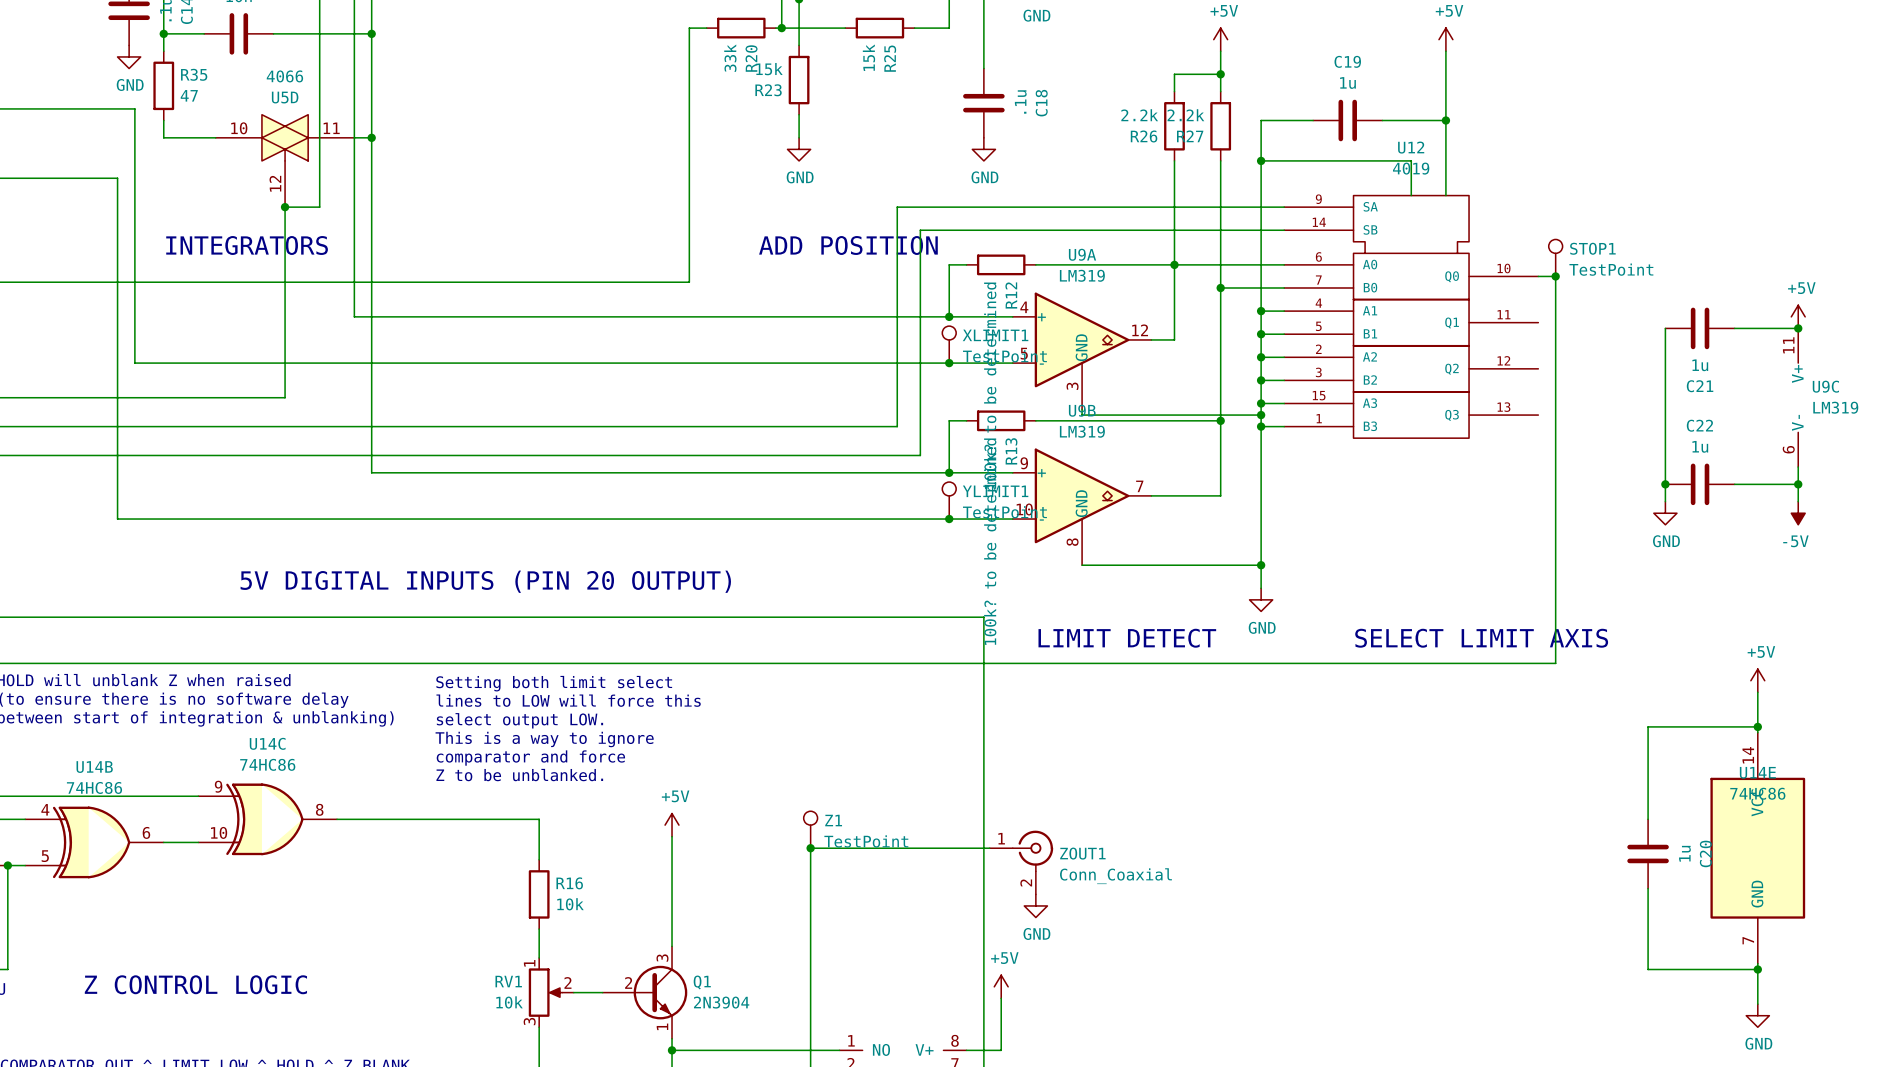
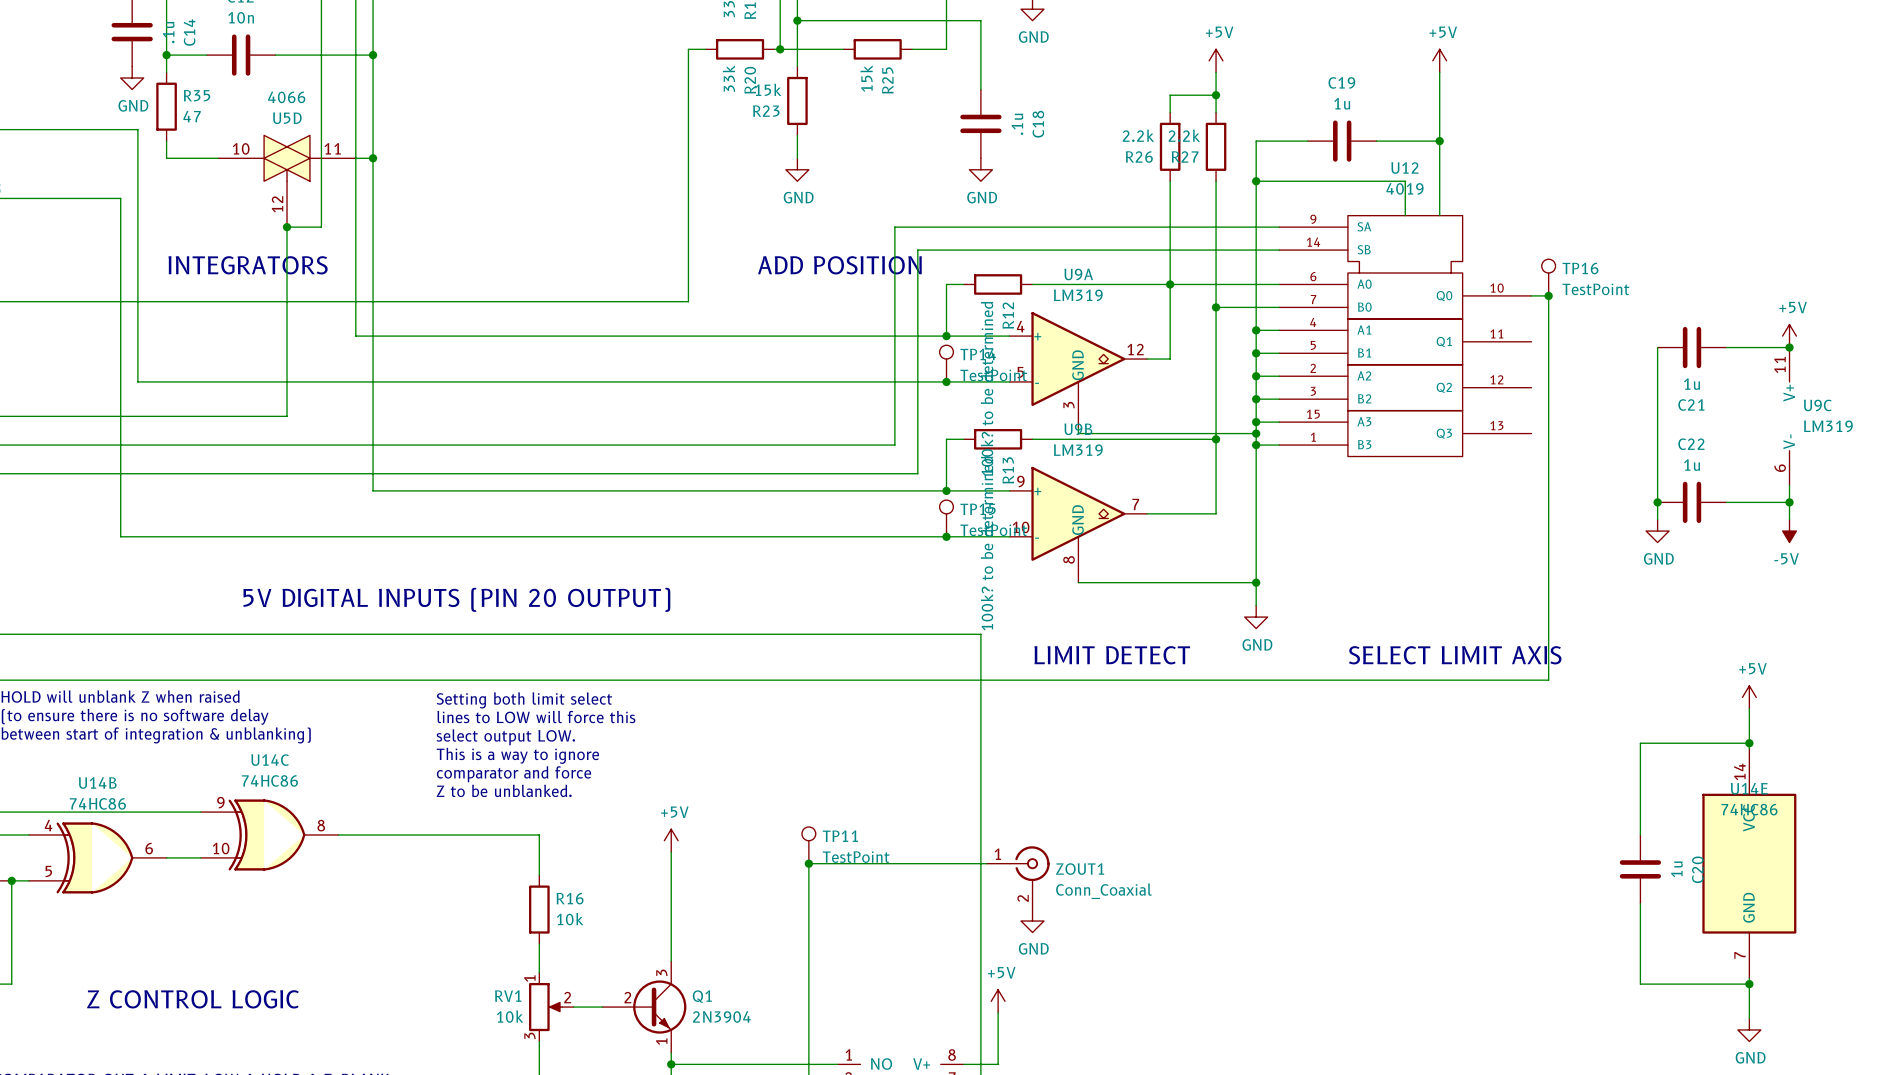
STOP1 name: STOP1 (1592, 248) -> TP16 (1580, 268)
XLIMIT1 name: XLIMIT1 (995, 335) -> TP14 (978, 354)
YLIMIT1 name: YLIMIT1 (995, 491) -> TP15 (978, 509)
Z1 name: Z1 (833, 820) -> TP11 (840, 836)

